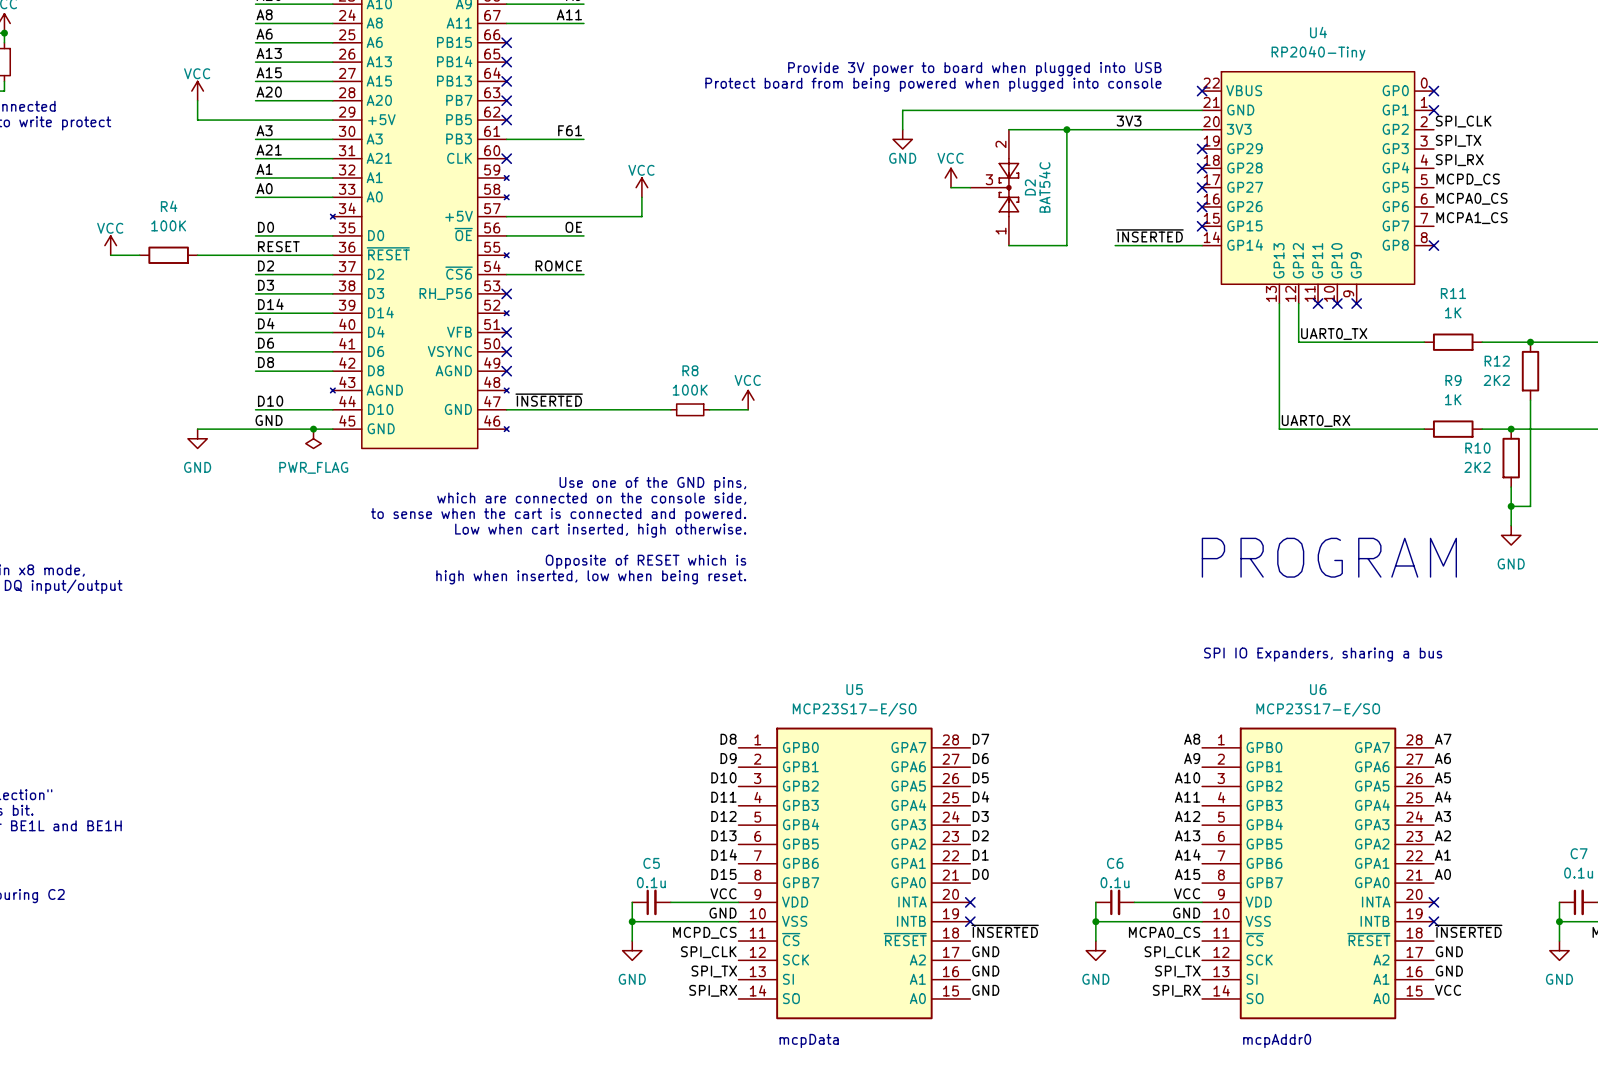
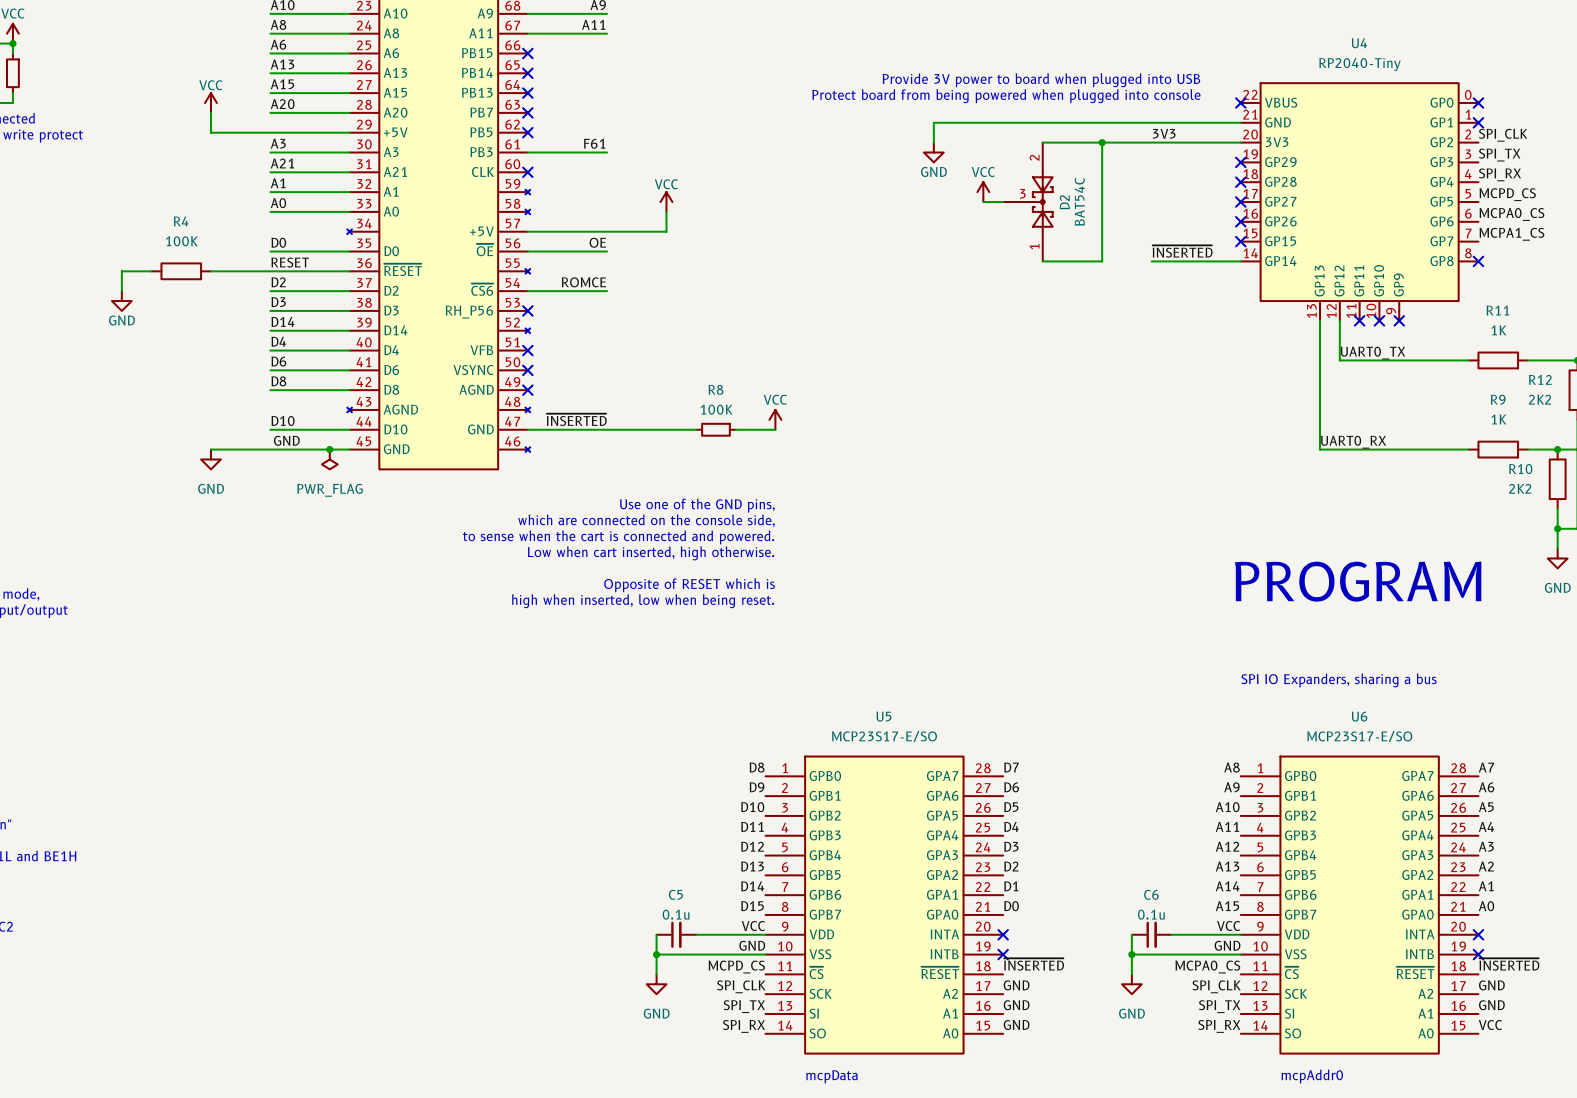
power symbol: VCC (110, 245) -> none
wire: none -> (121, 271) (121, 291)
power symbol: none -> GND (121, 301)

